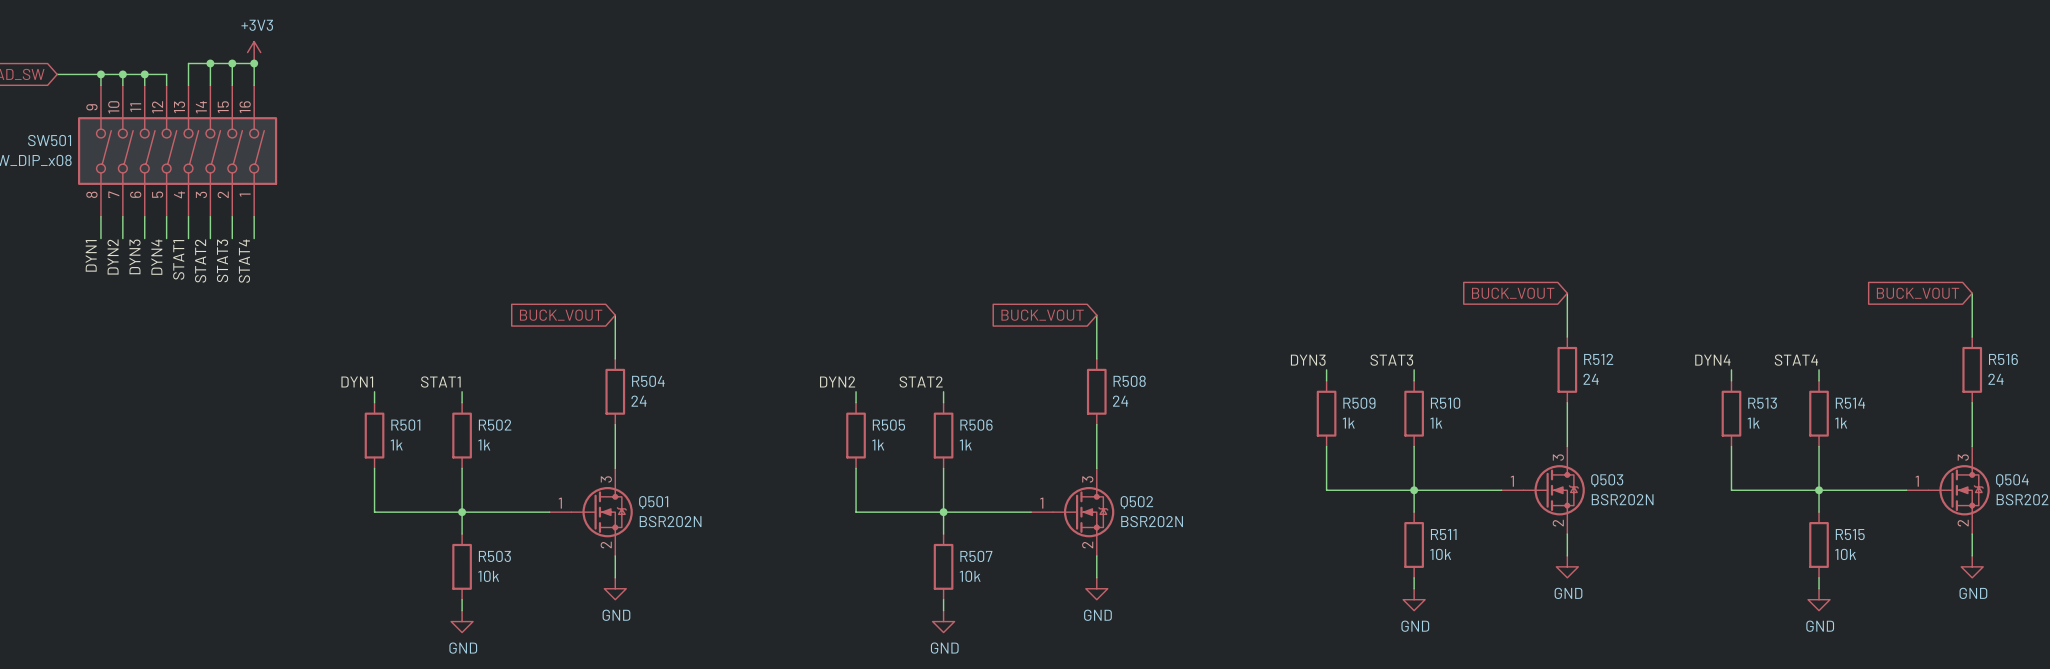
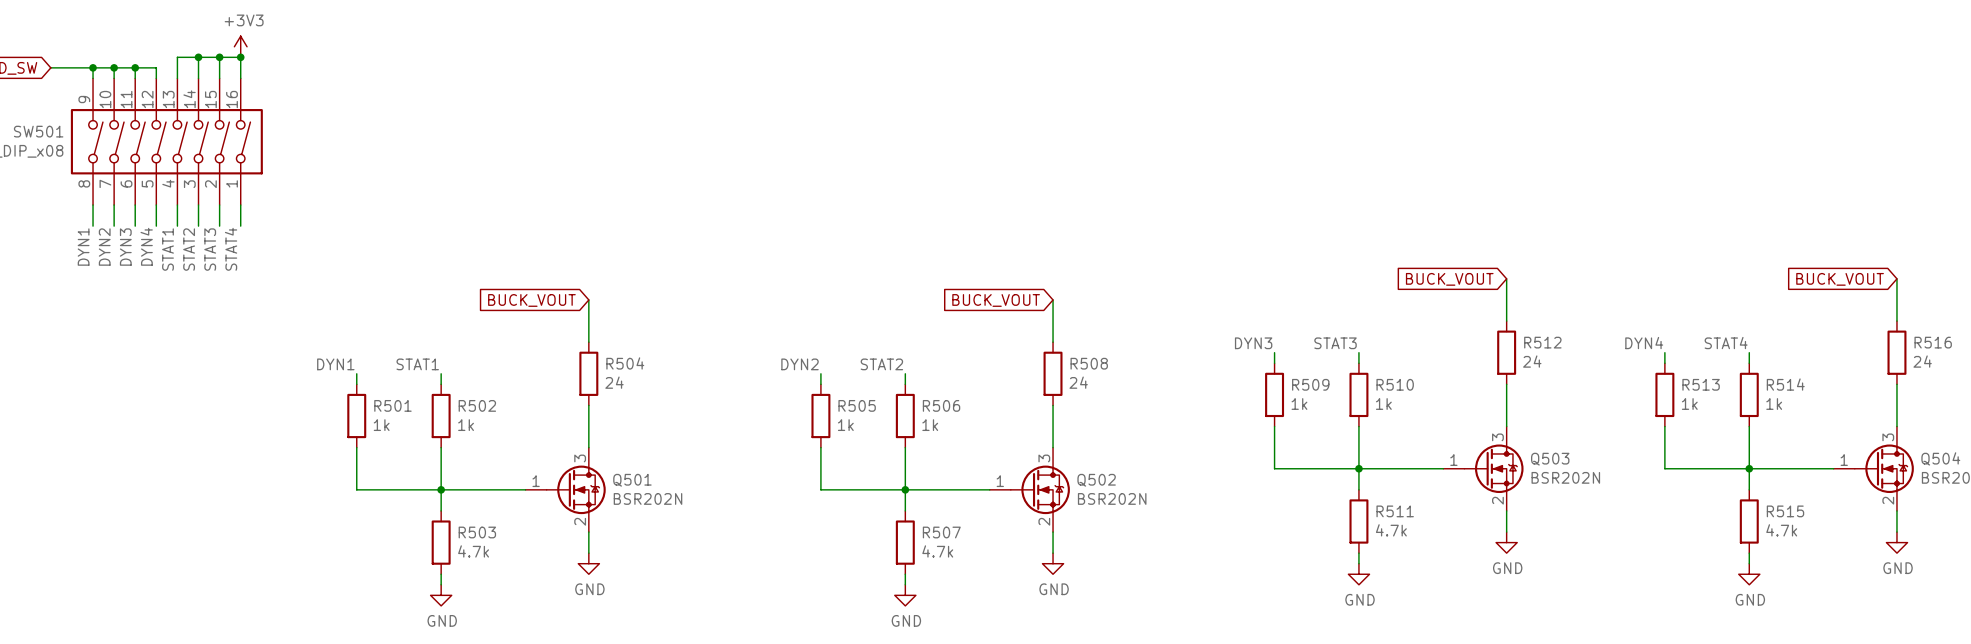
R511 value: 10k (1440, 554) -> 4.7k (1391, 530)
R515 value: 10k (1845, 554) -> 4.7k (1781, 530)
R503 value: 10k (488, 576) -> 4.7k (473, 551)
R507 value: 10k (970, 576) -> 4.7k (937, 551)

